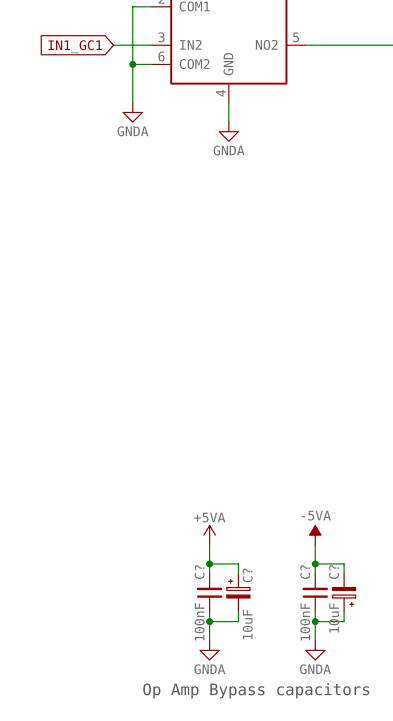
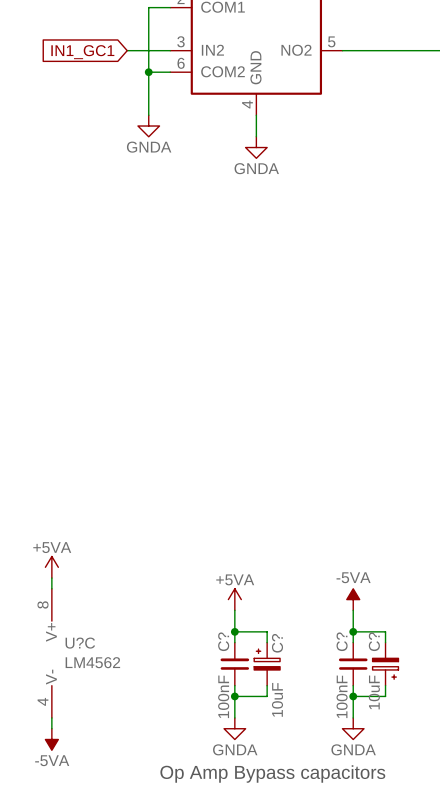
power symbol: none -> +5VA (51, 567)
wire: none -> (51, 578) (51, 588)
U?C: none -> LM4562 (51, 653)
wire: none -> (51, 717) (51, 728)
power symbol: none -> -5VA (51, 739)

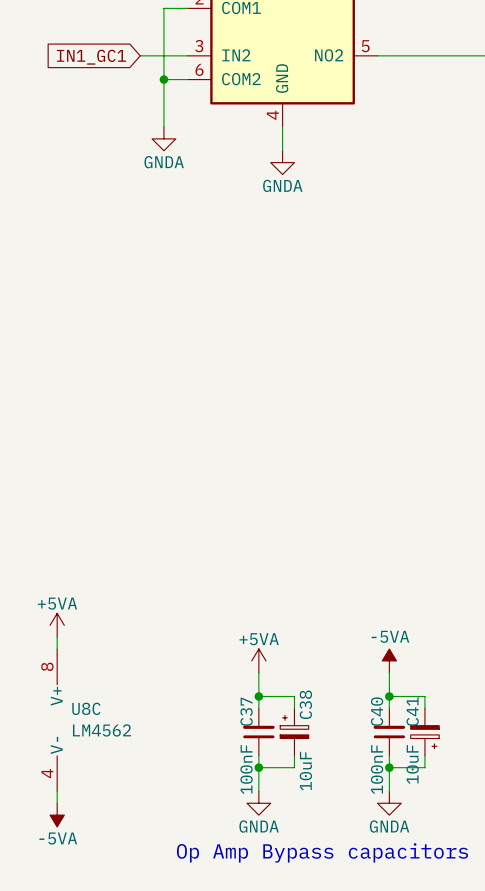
C? name: C? (223, 641) -> C37 (246, 711)
C? name: C? (342, 641) -> C40 (377, 711)
C? name: C? (374, 641) -> C41 (412, 711)
U?C name: U?C (80, 643) -> U8C (86, 708)
C? name: C? (277, 643) -> C38 (305, 704)

